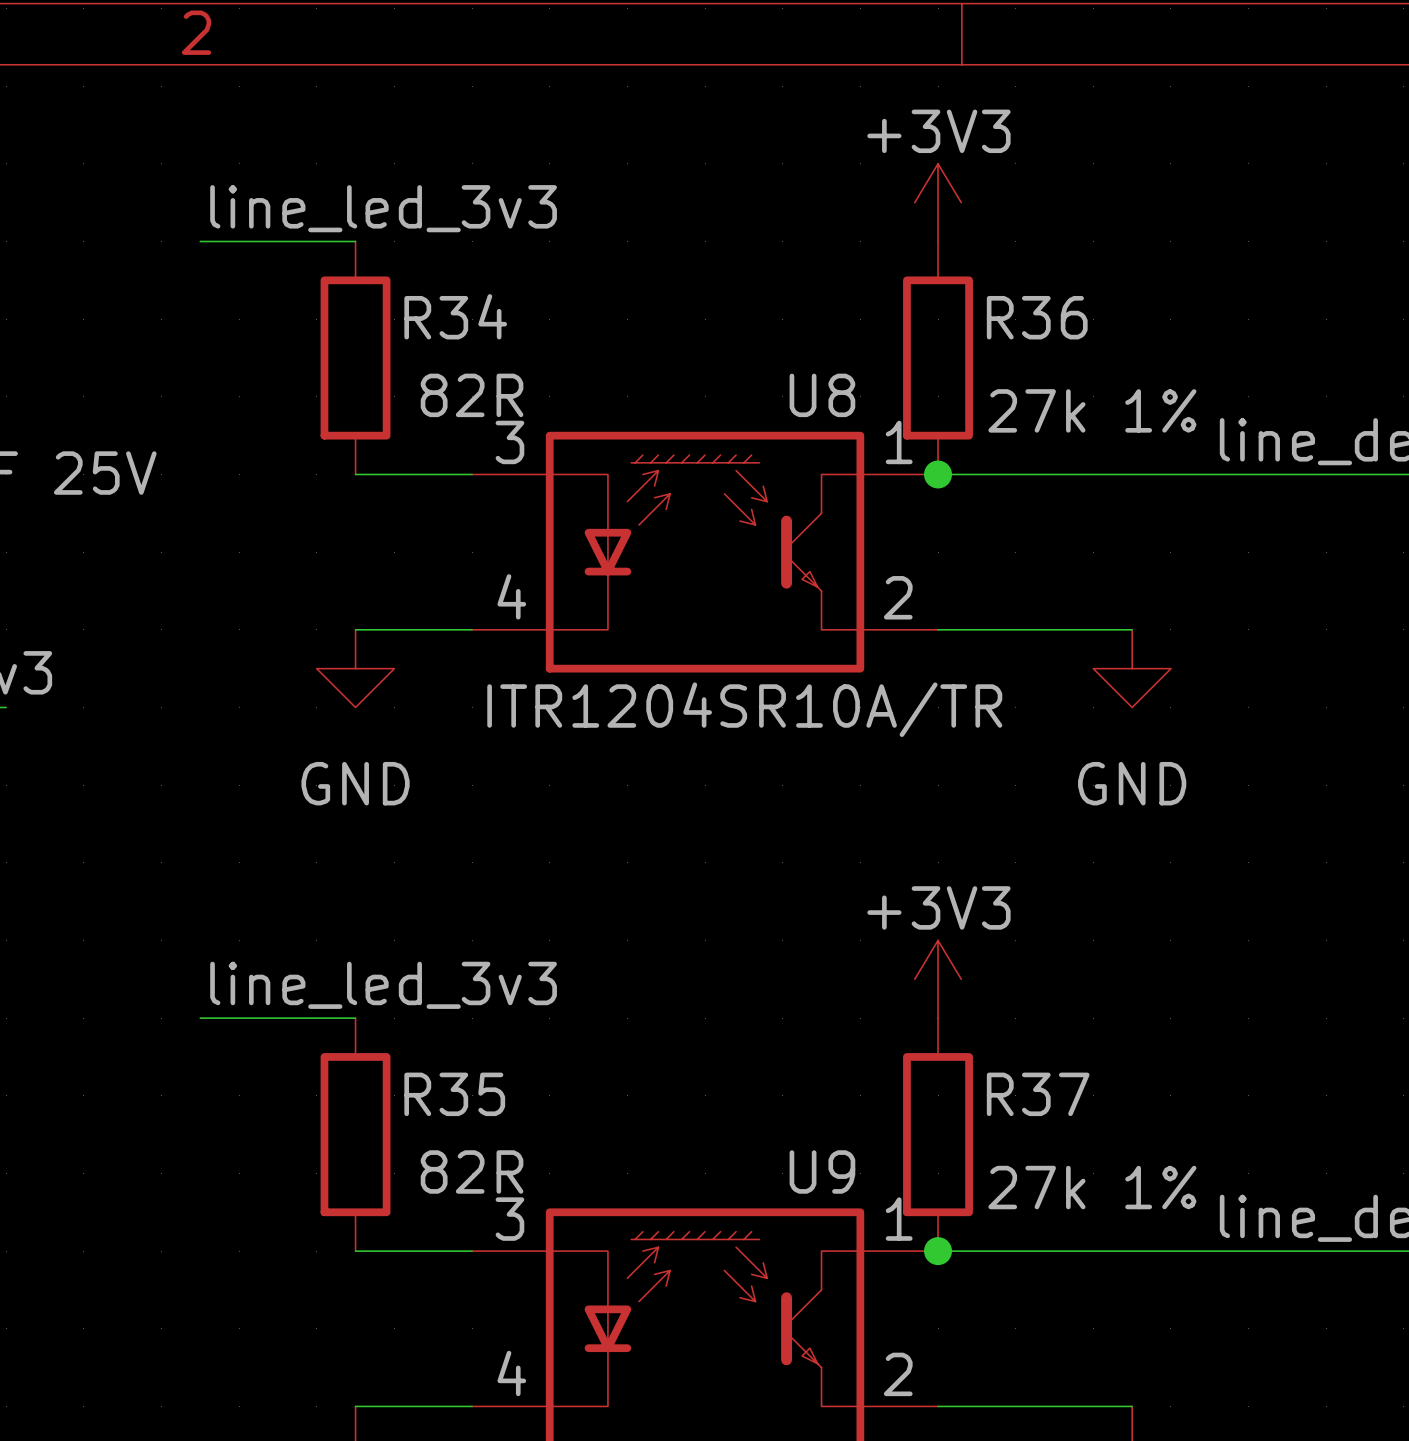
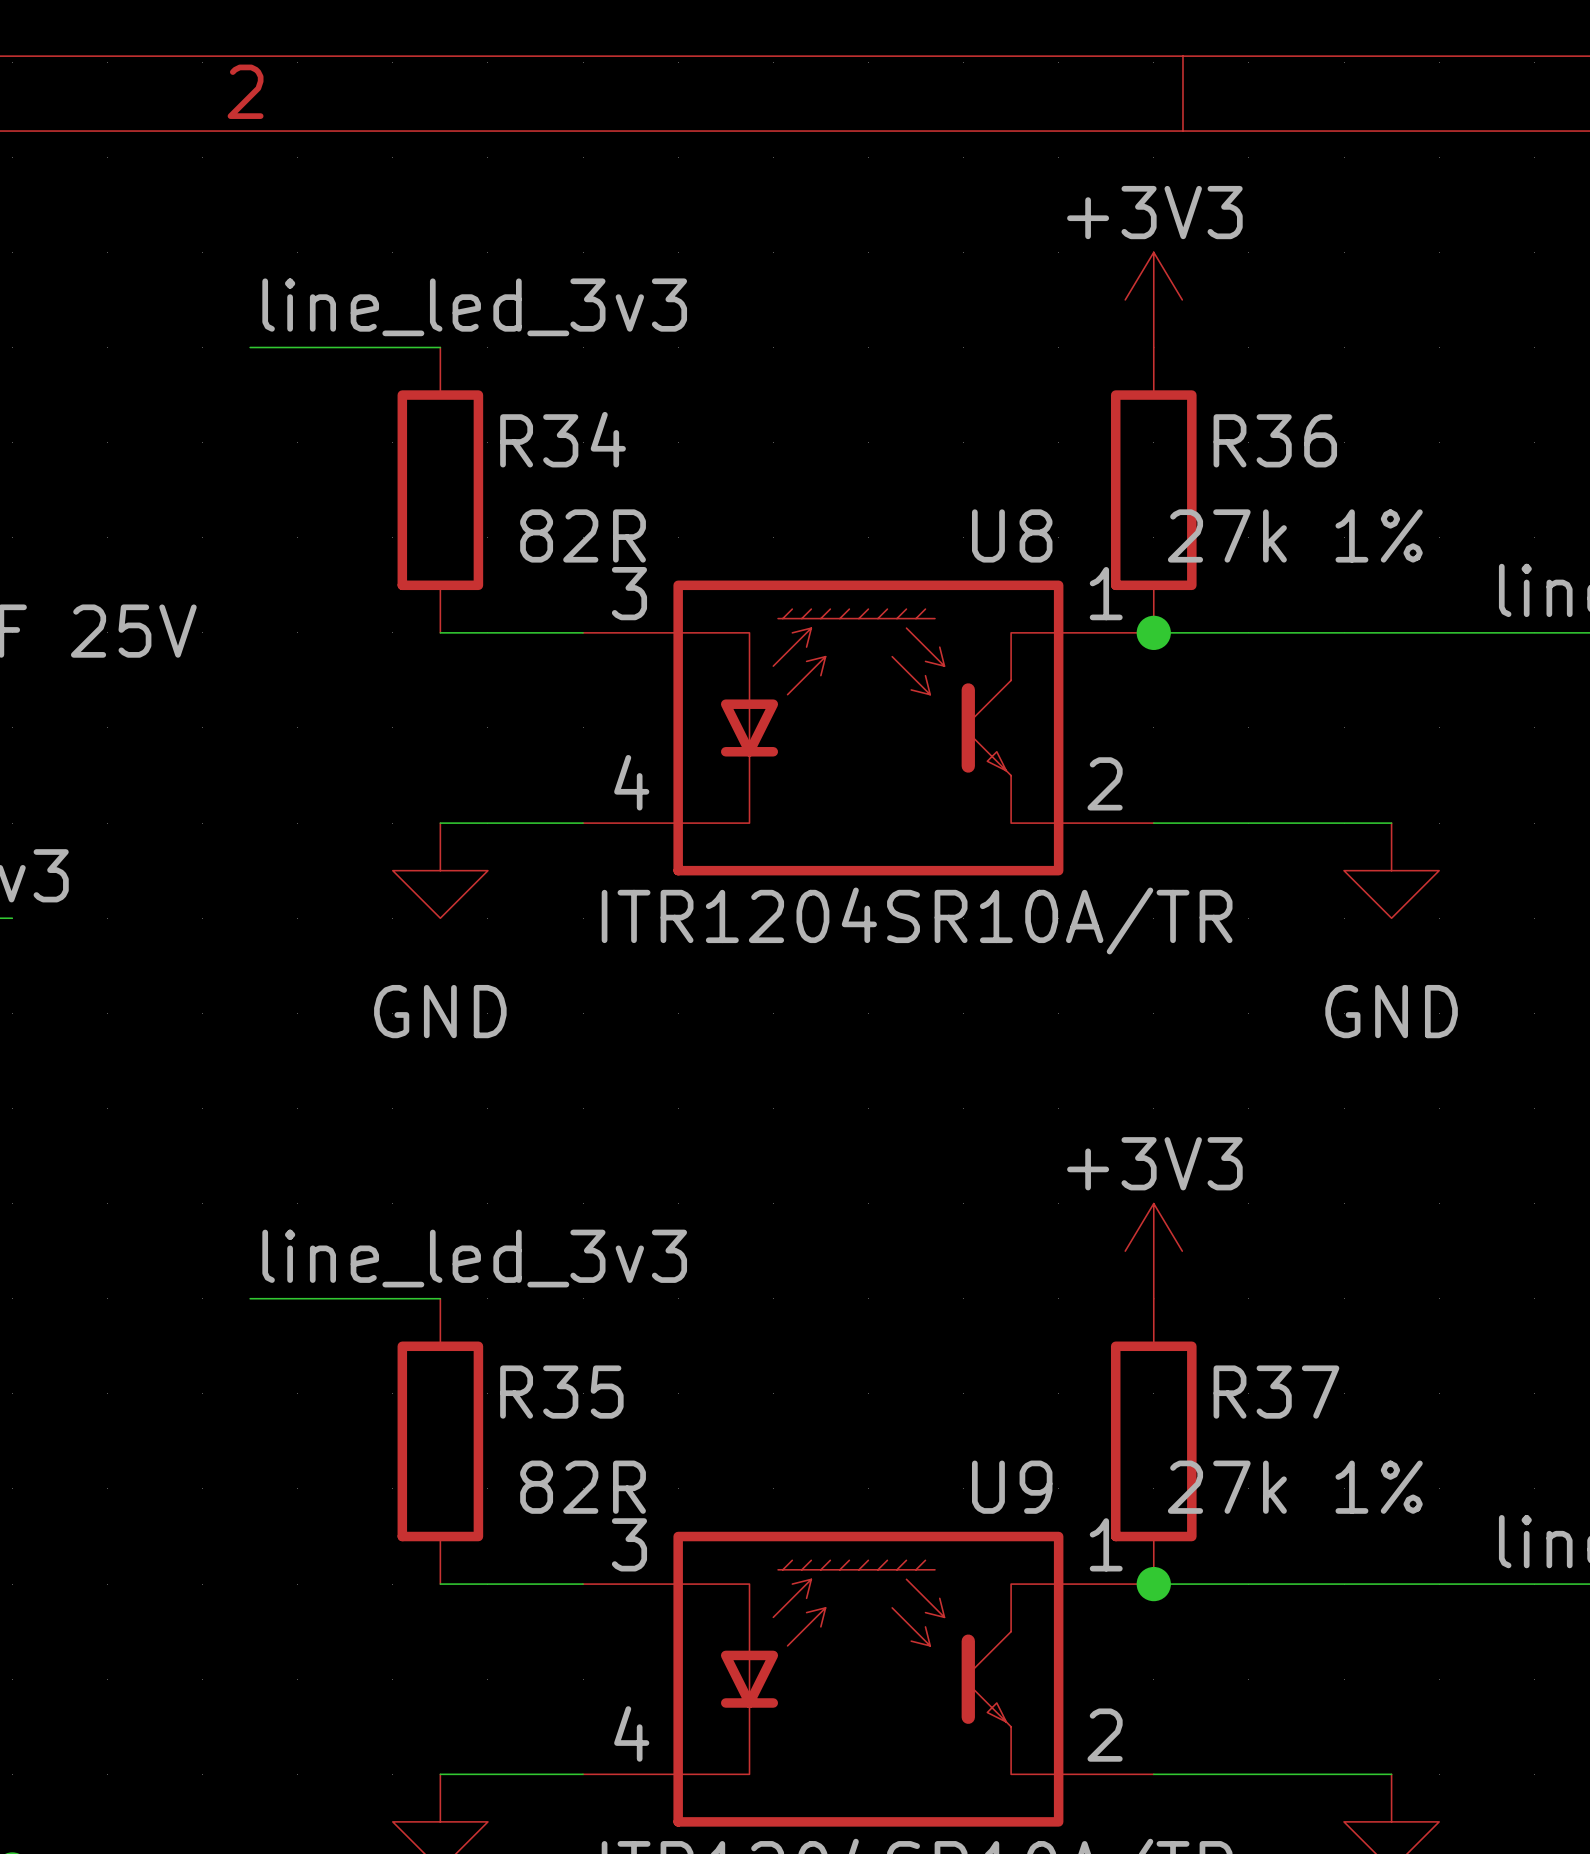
R36 value position: 27k 1% (1092, 410) -> 27k 1% (1295, 535)
R37 value position: 27k 1% (1092, 1187) -> 27k 1% (1295, 1487)

